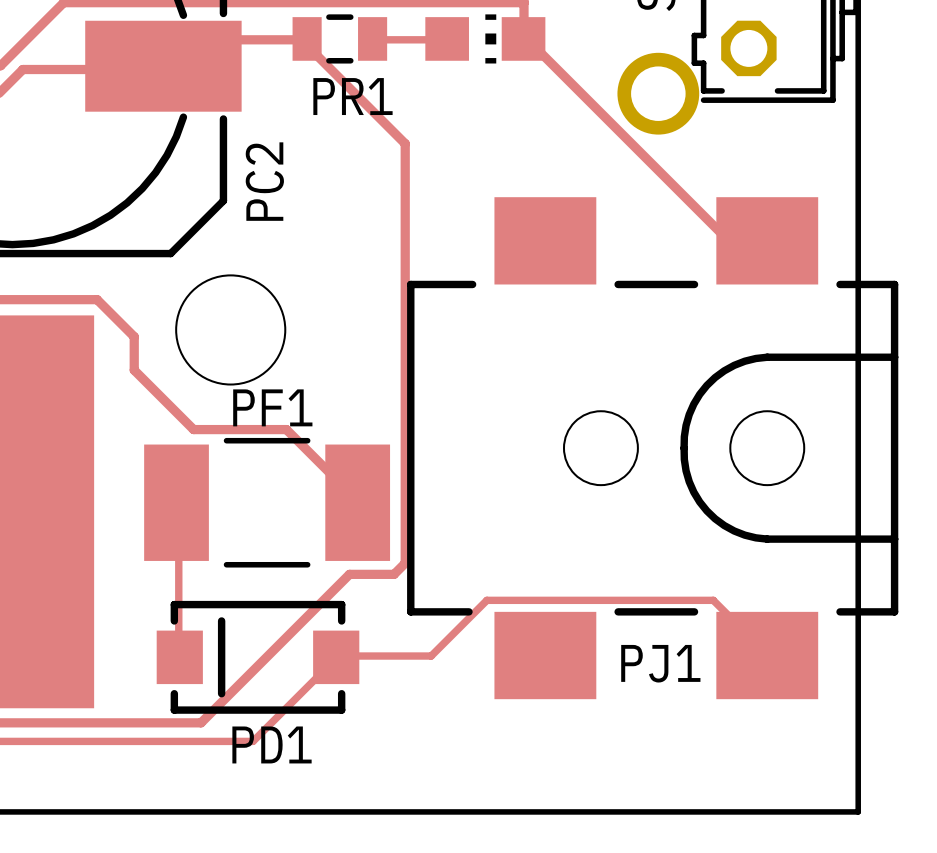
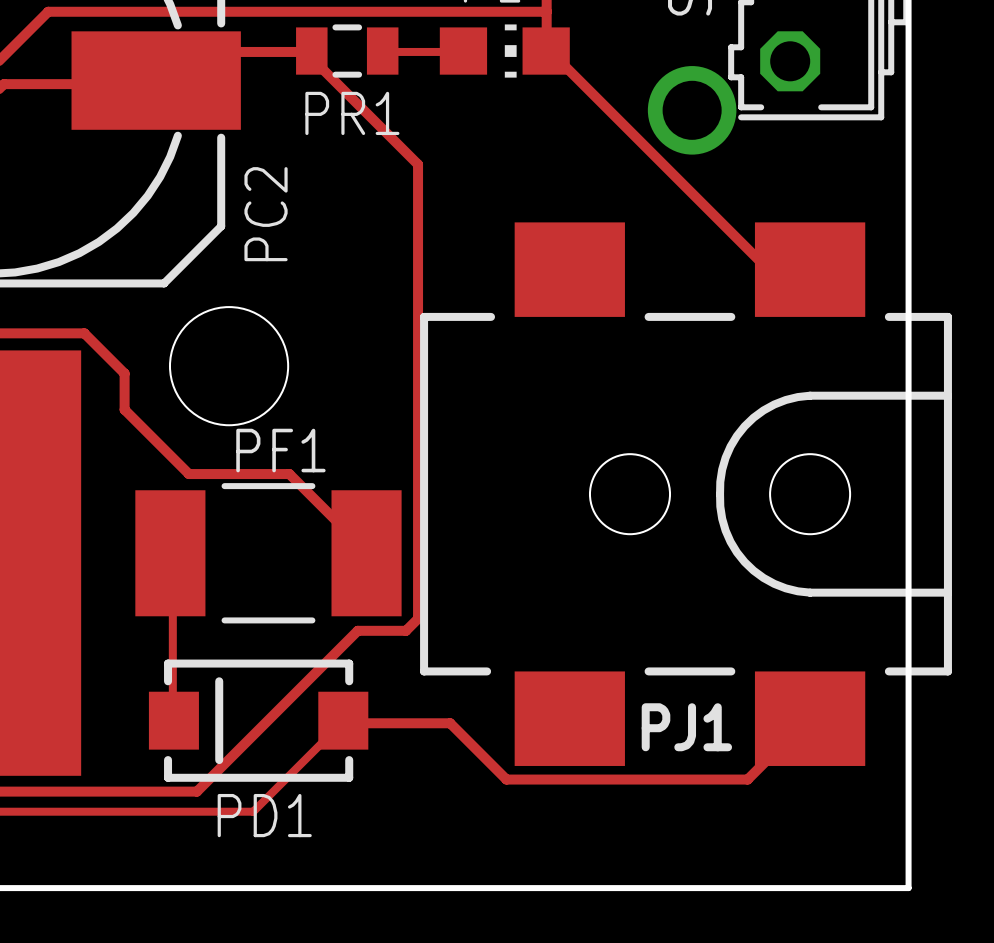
track: (767, 655) (713, 600) (486, 600) (431, 656) (336, 657) -> (810, 718) (747, 779) (506, 779) (450, 723) (345, 723) (343, 720)

